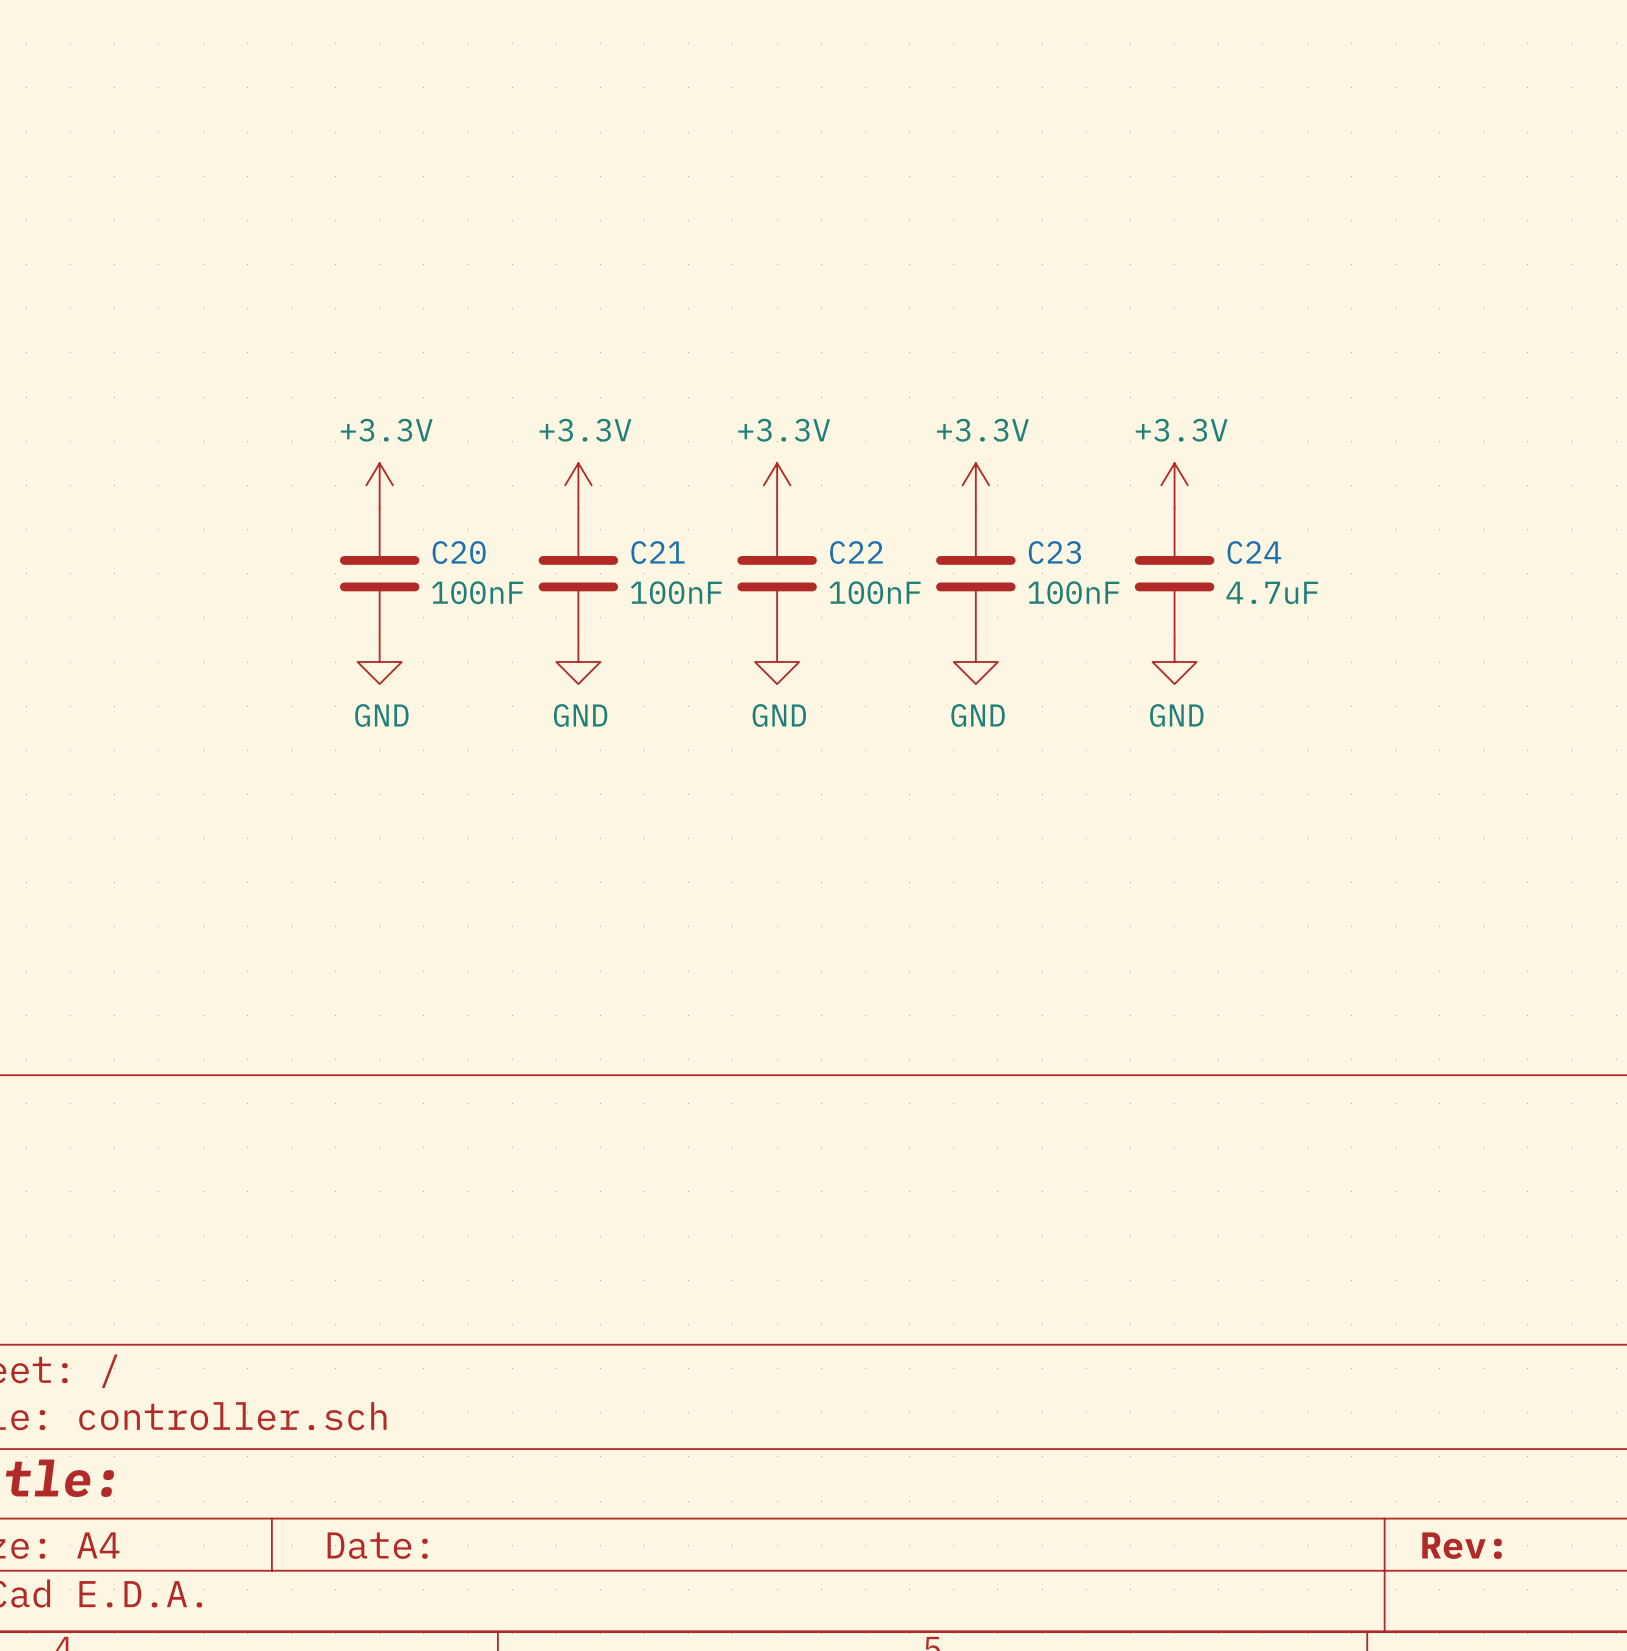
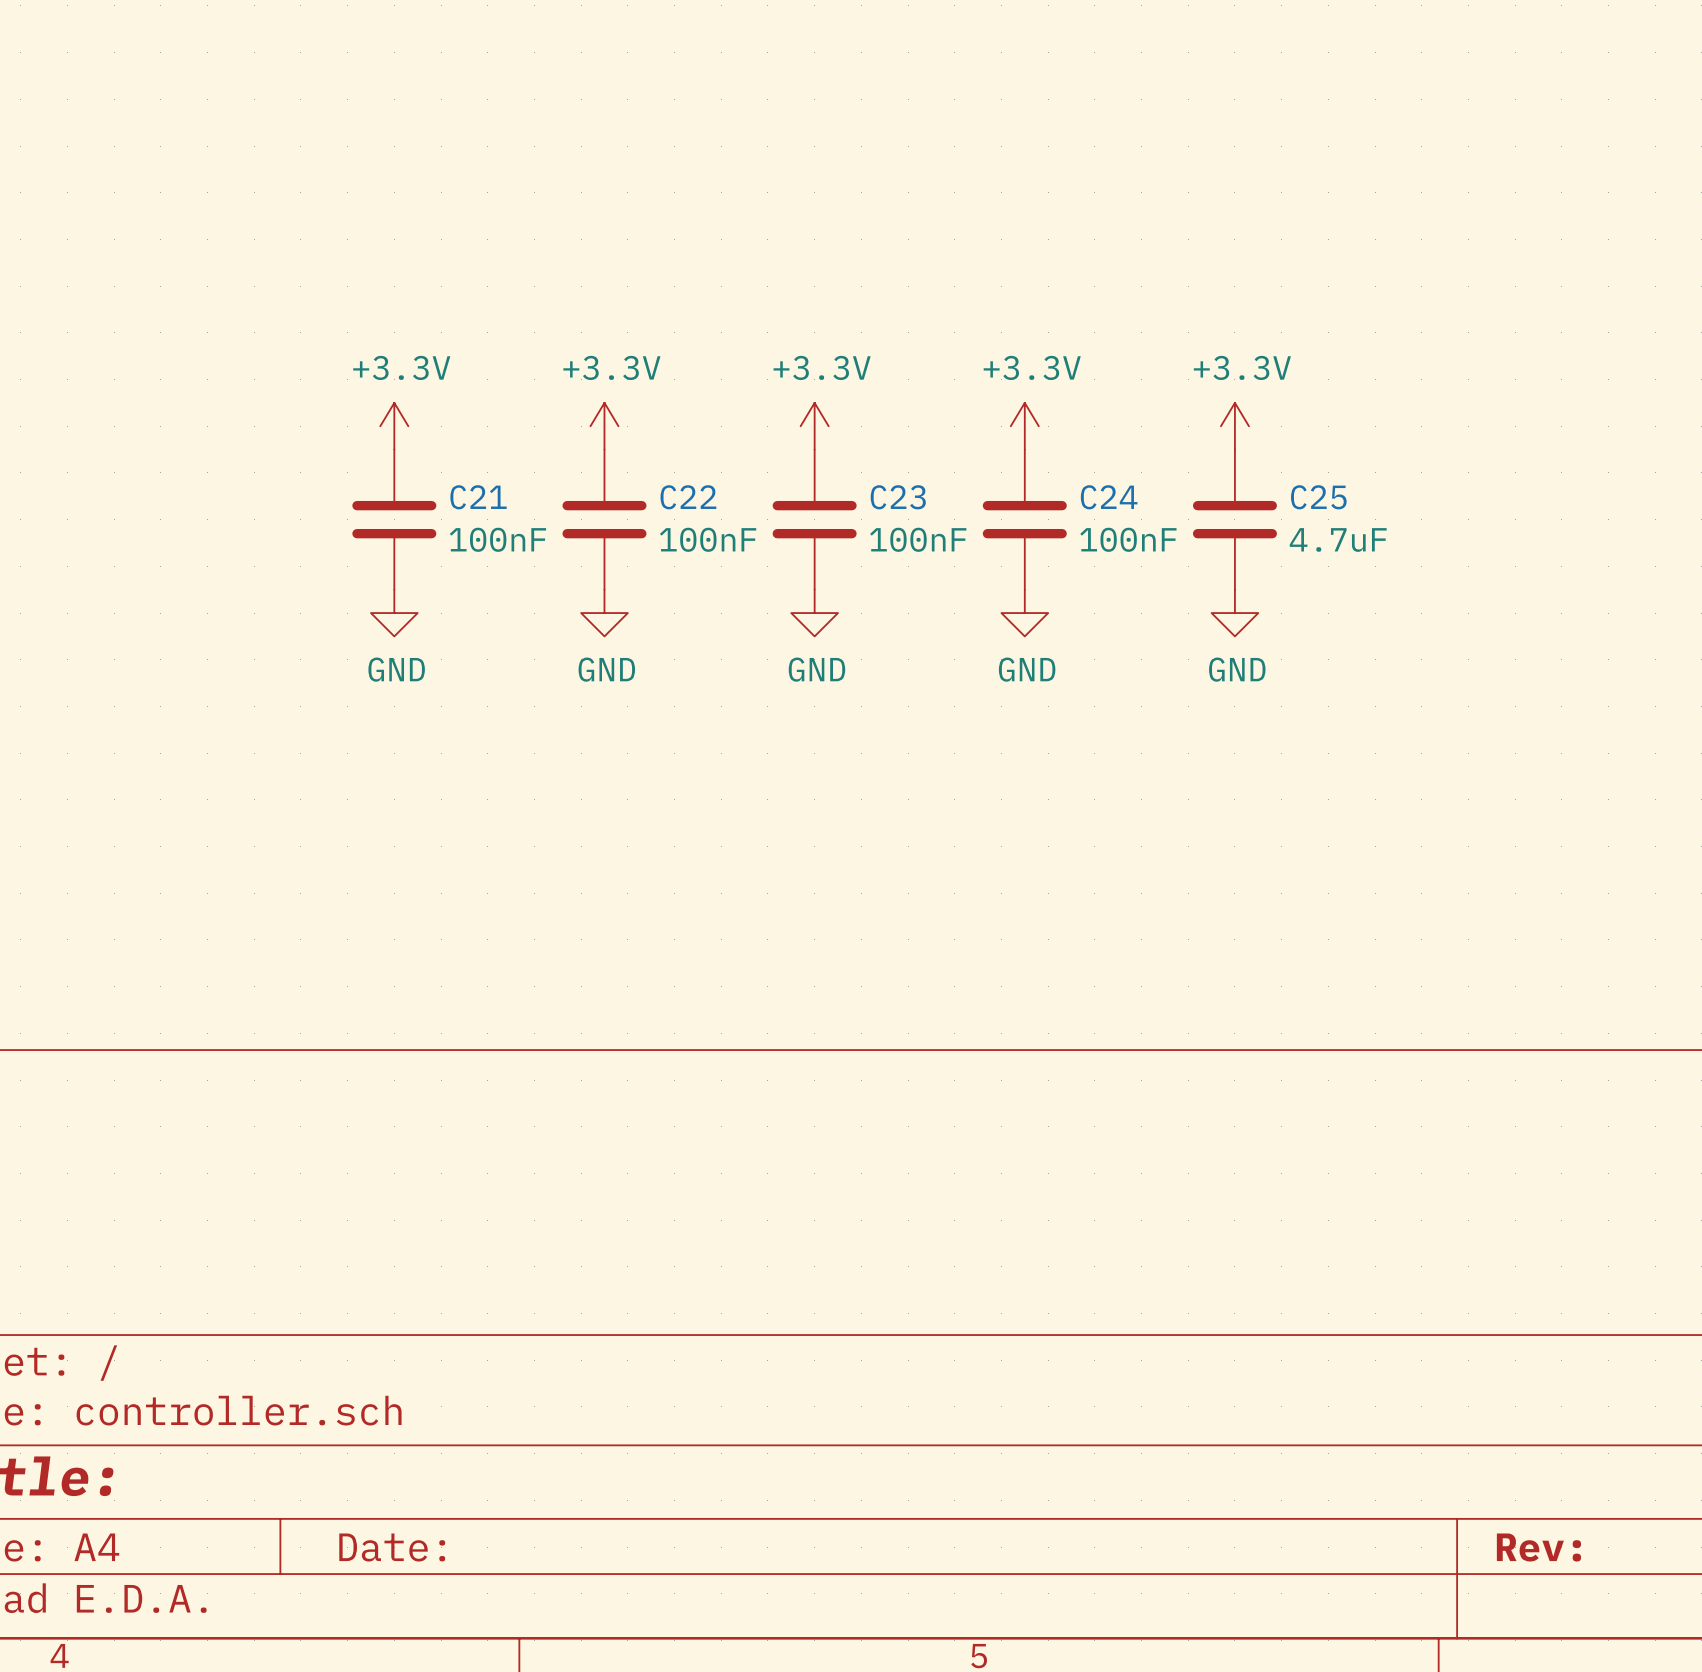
C20 name: C20 (459, 552) -> C21 (478, 497)
C21 name: C21 (658, 552) -> C22 (688, 497)
C22 name: C22 (856, 552) -> C23 (898, 497)
C23 name: C23 (1054, 552) -> C24 (1109, 497)
C24 name: C24 (1254, 552) -> C25 (1318, 497)

